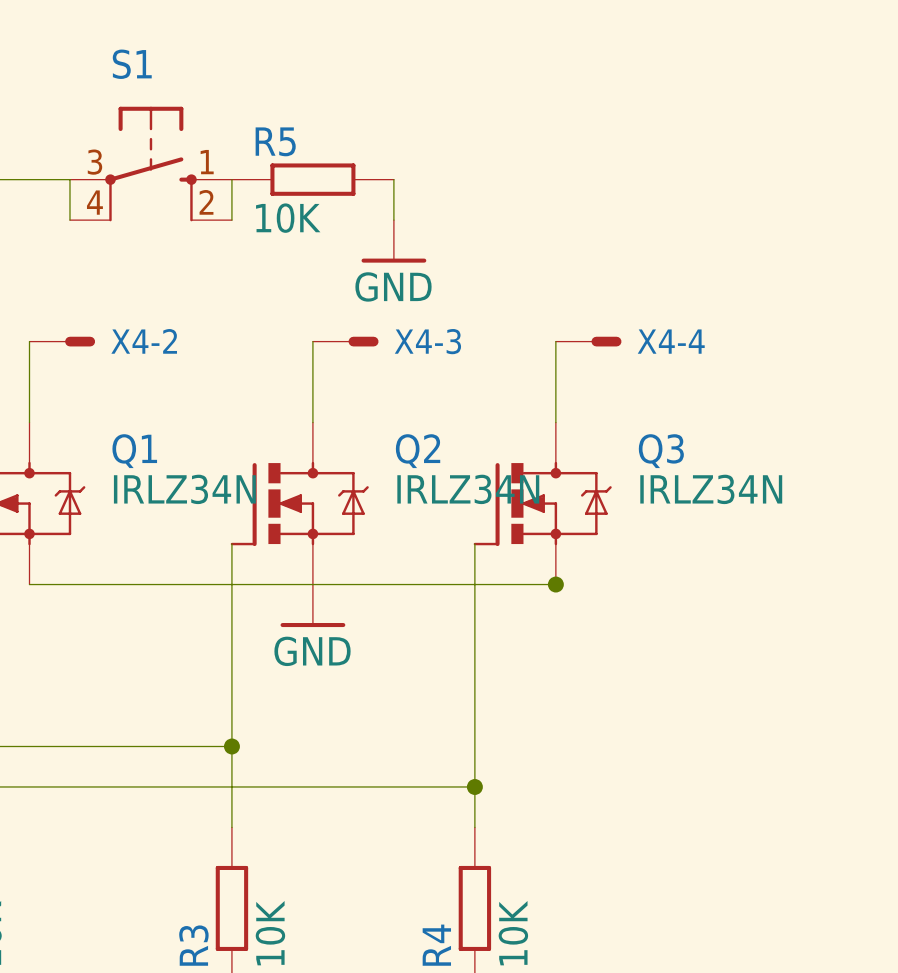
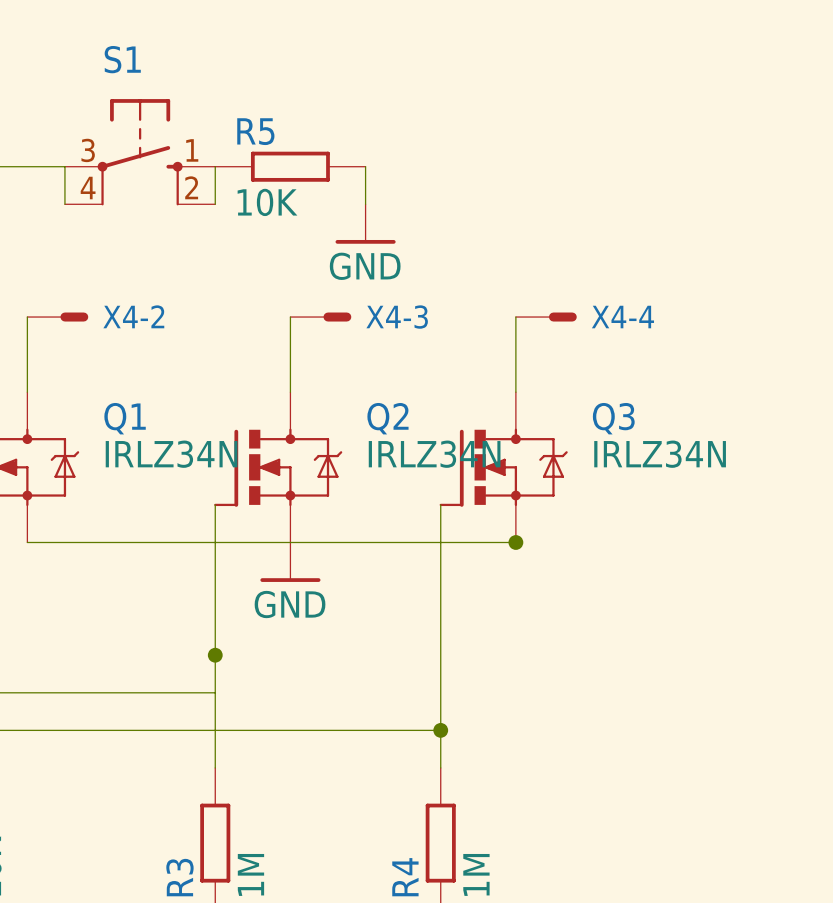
junction position: (231, 746) -> (215, 655)
R3 value: 10K (270, 933) -> 1M (250, 874)
R4 value: 10K (513, 933) -> 1M (476, 874)

